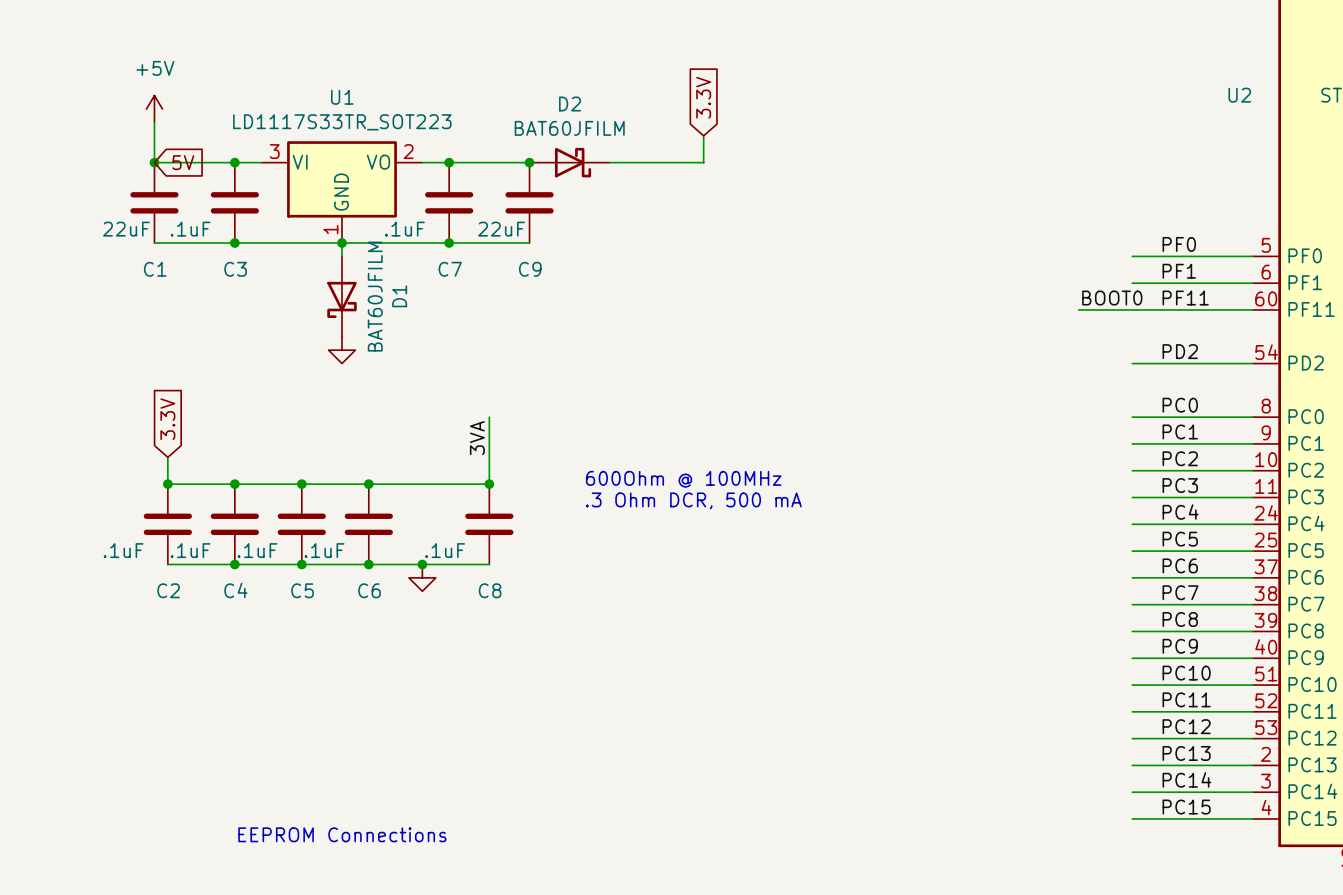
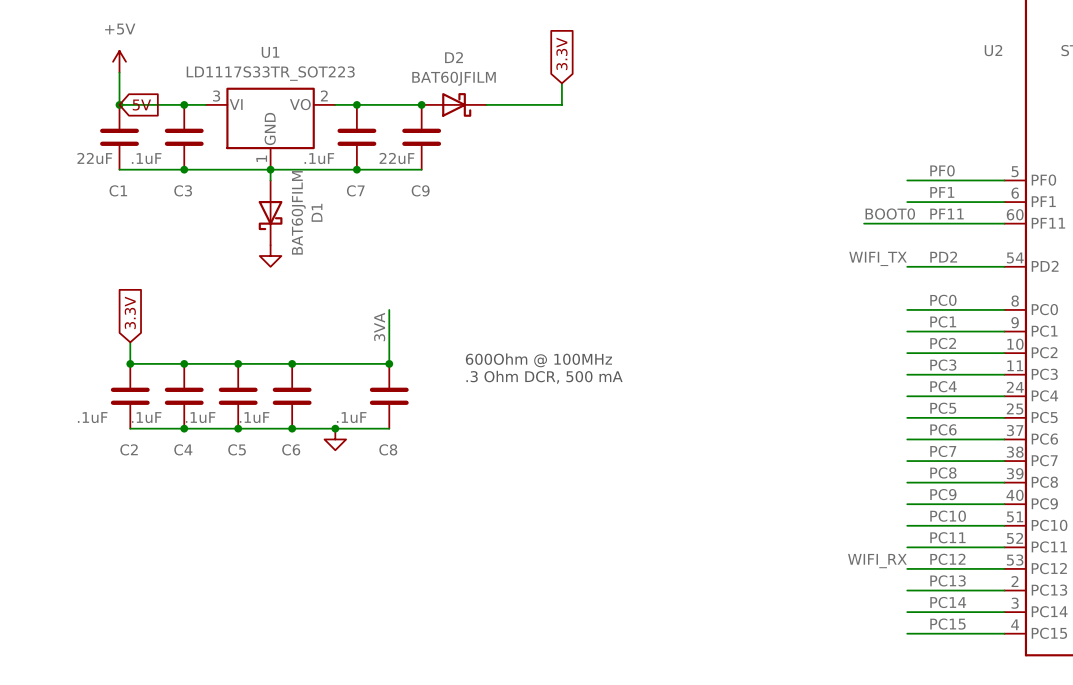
label: none -> WIFI_TX (878, 258)
label: none -> WIFI_RX (877, 561)
text: EEPROM Connections (342, 834) -> none

